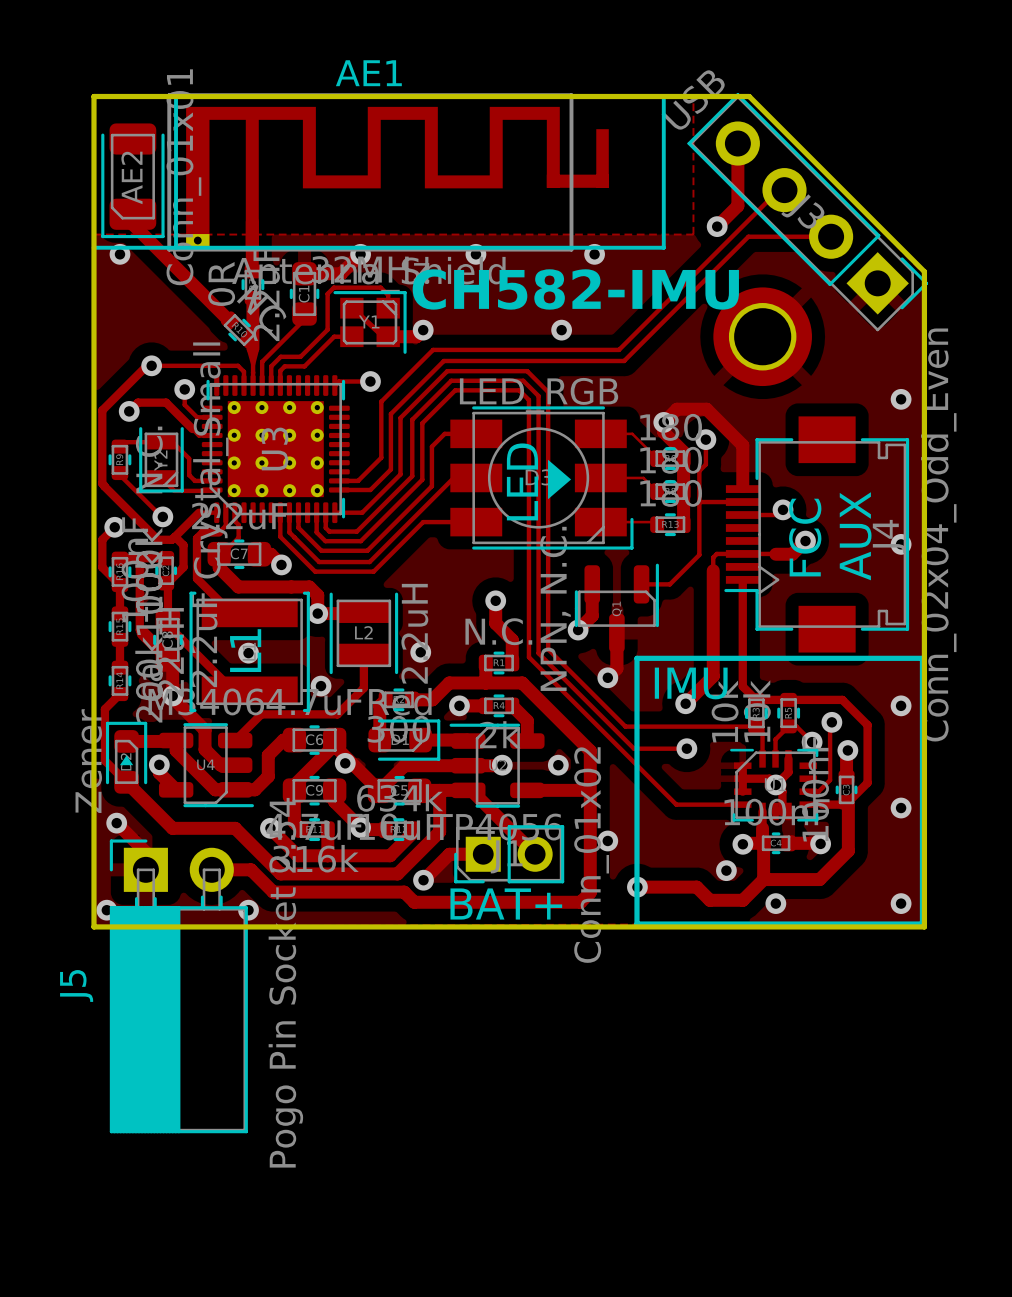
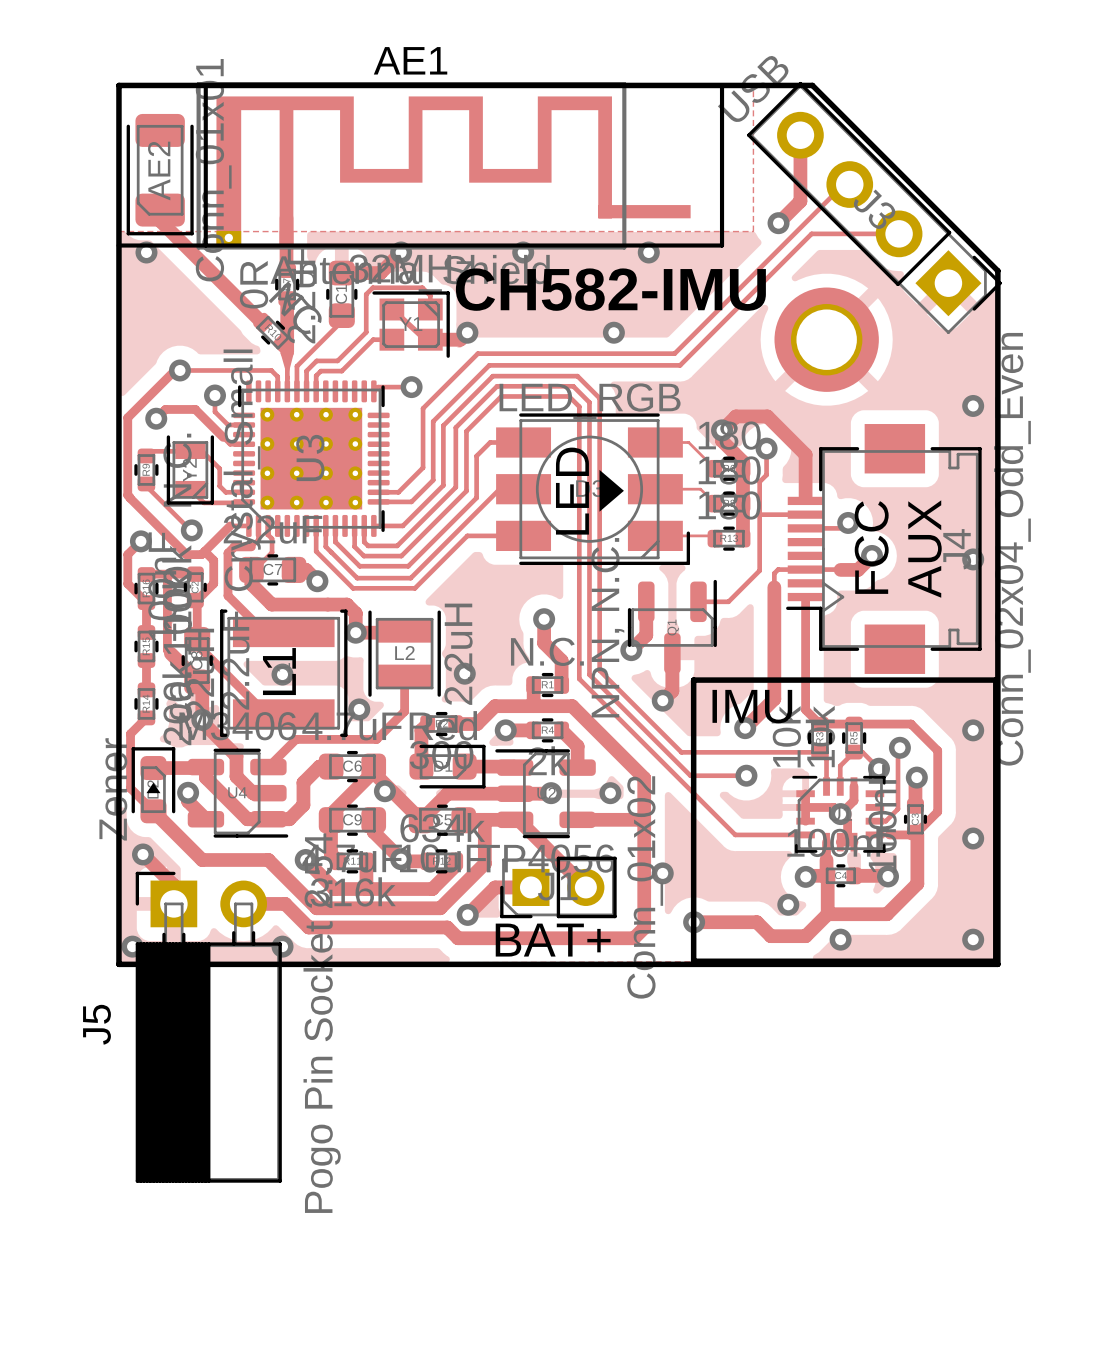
AE1 footprint: [167, 93, 609, 252] -> [196, 82, 627, 250]
drawing: [596, 129, 609, 188] -> none
drawing: none -> [598, 205, 691, 219]

